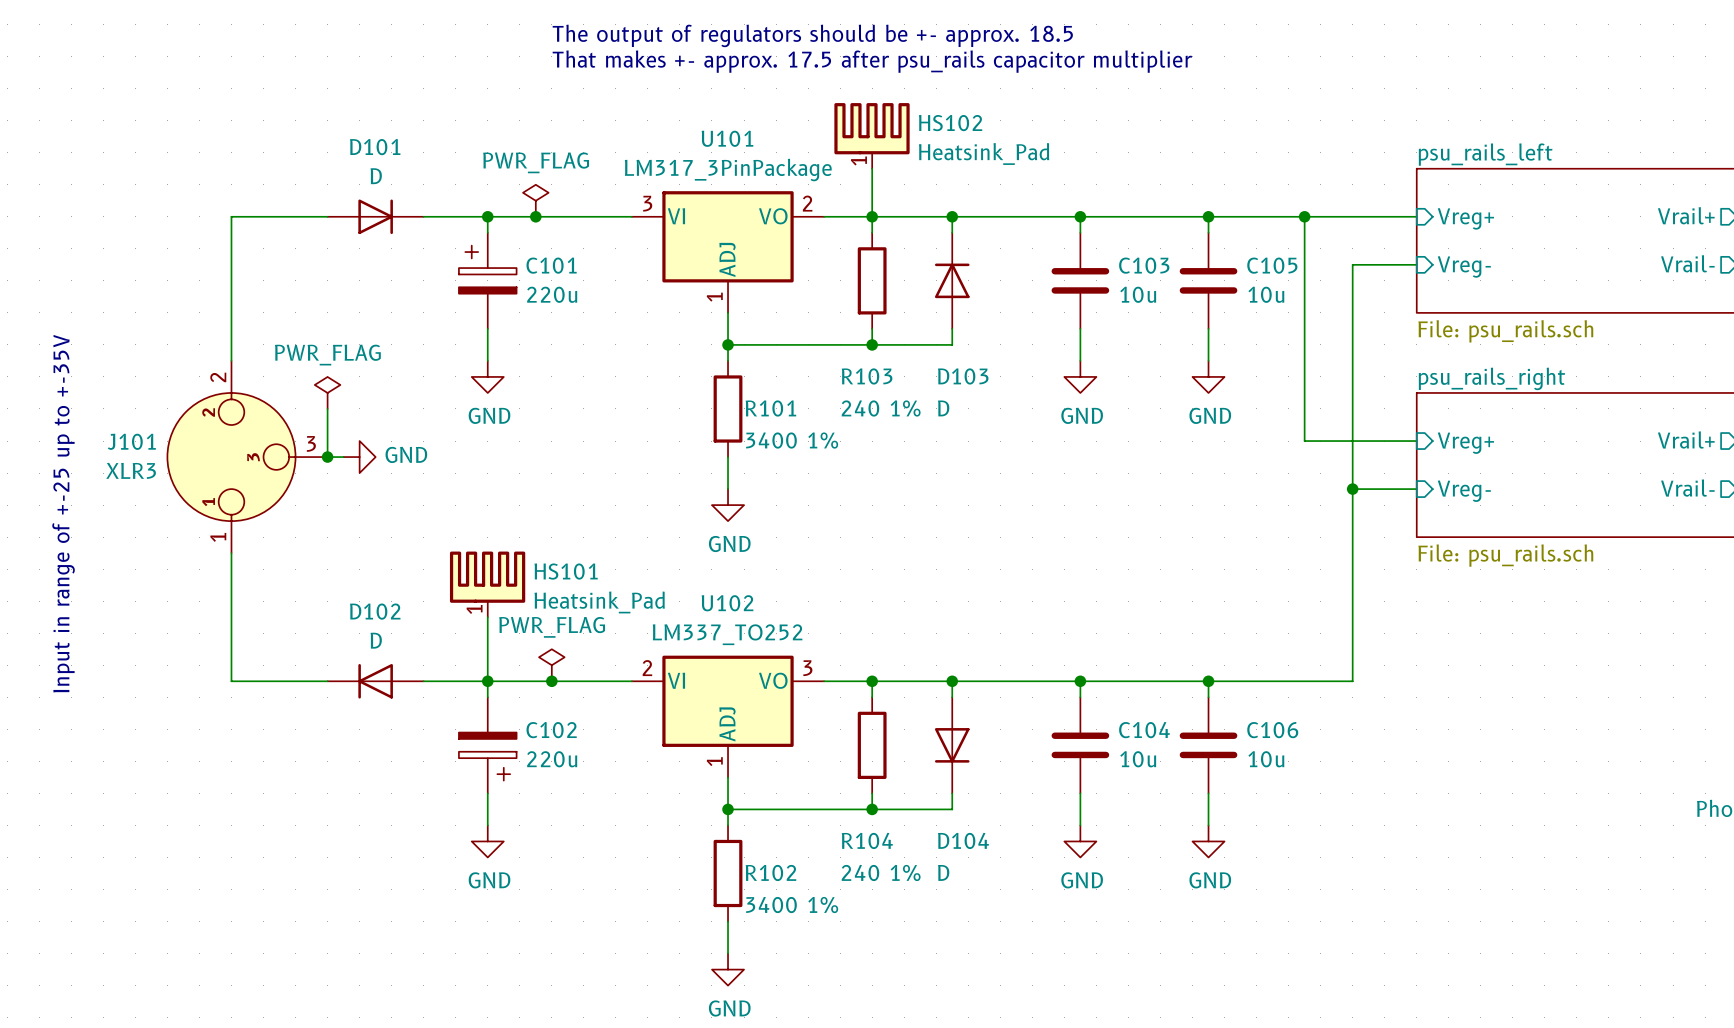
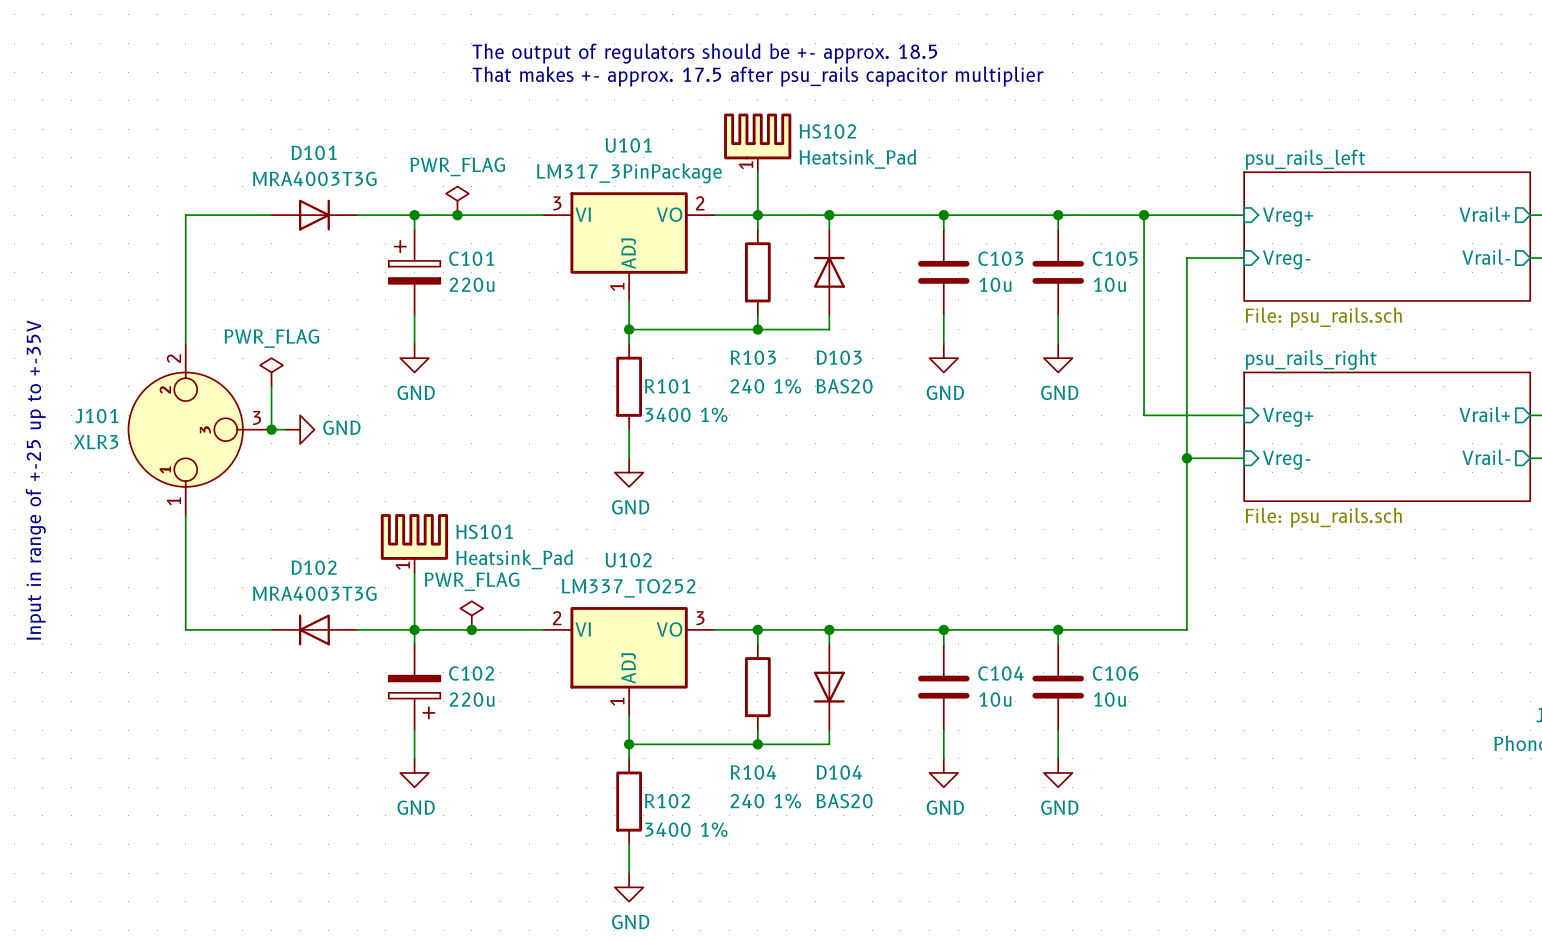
D101 value: D (376, 176) -> MRA4003T3G (314, 178)
D103 value: D (943, 408) -> BAS20 (844, 386)
D102 value: D (376, 640) -> MRA4003T3G (314, 593)
D104 value: D (943, 872) -> BAS20 (844, 801)

